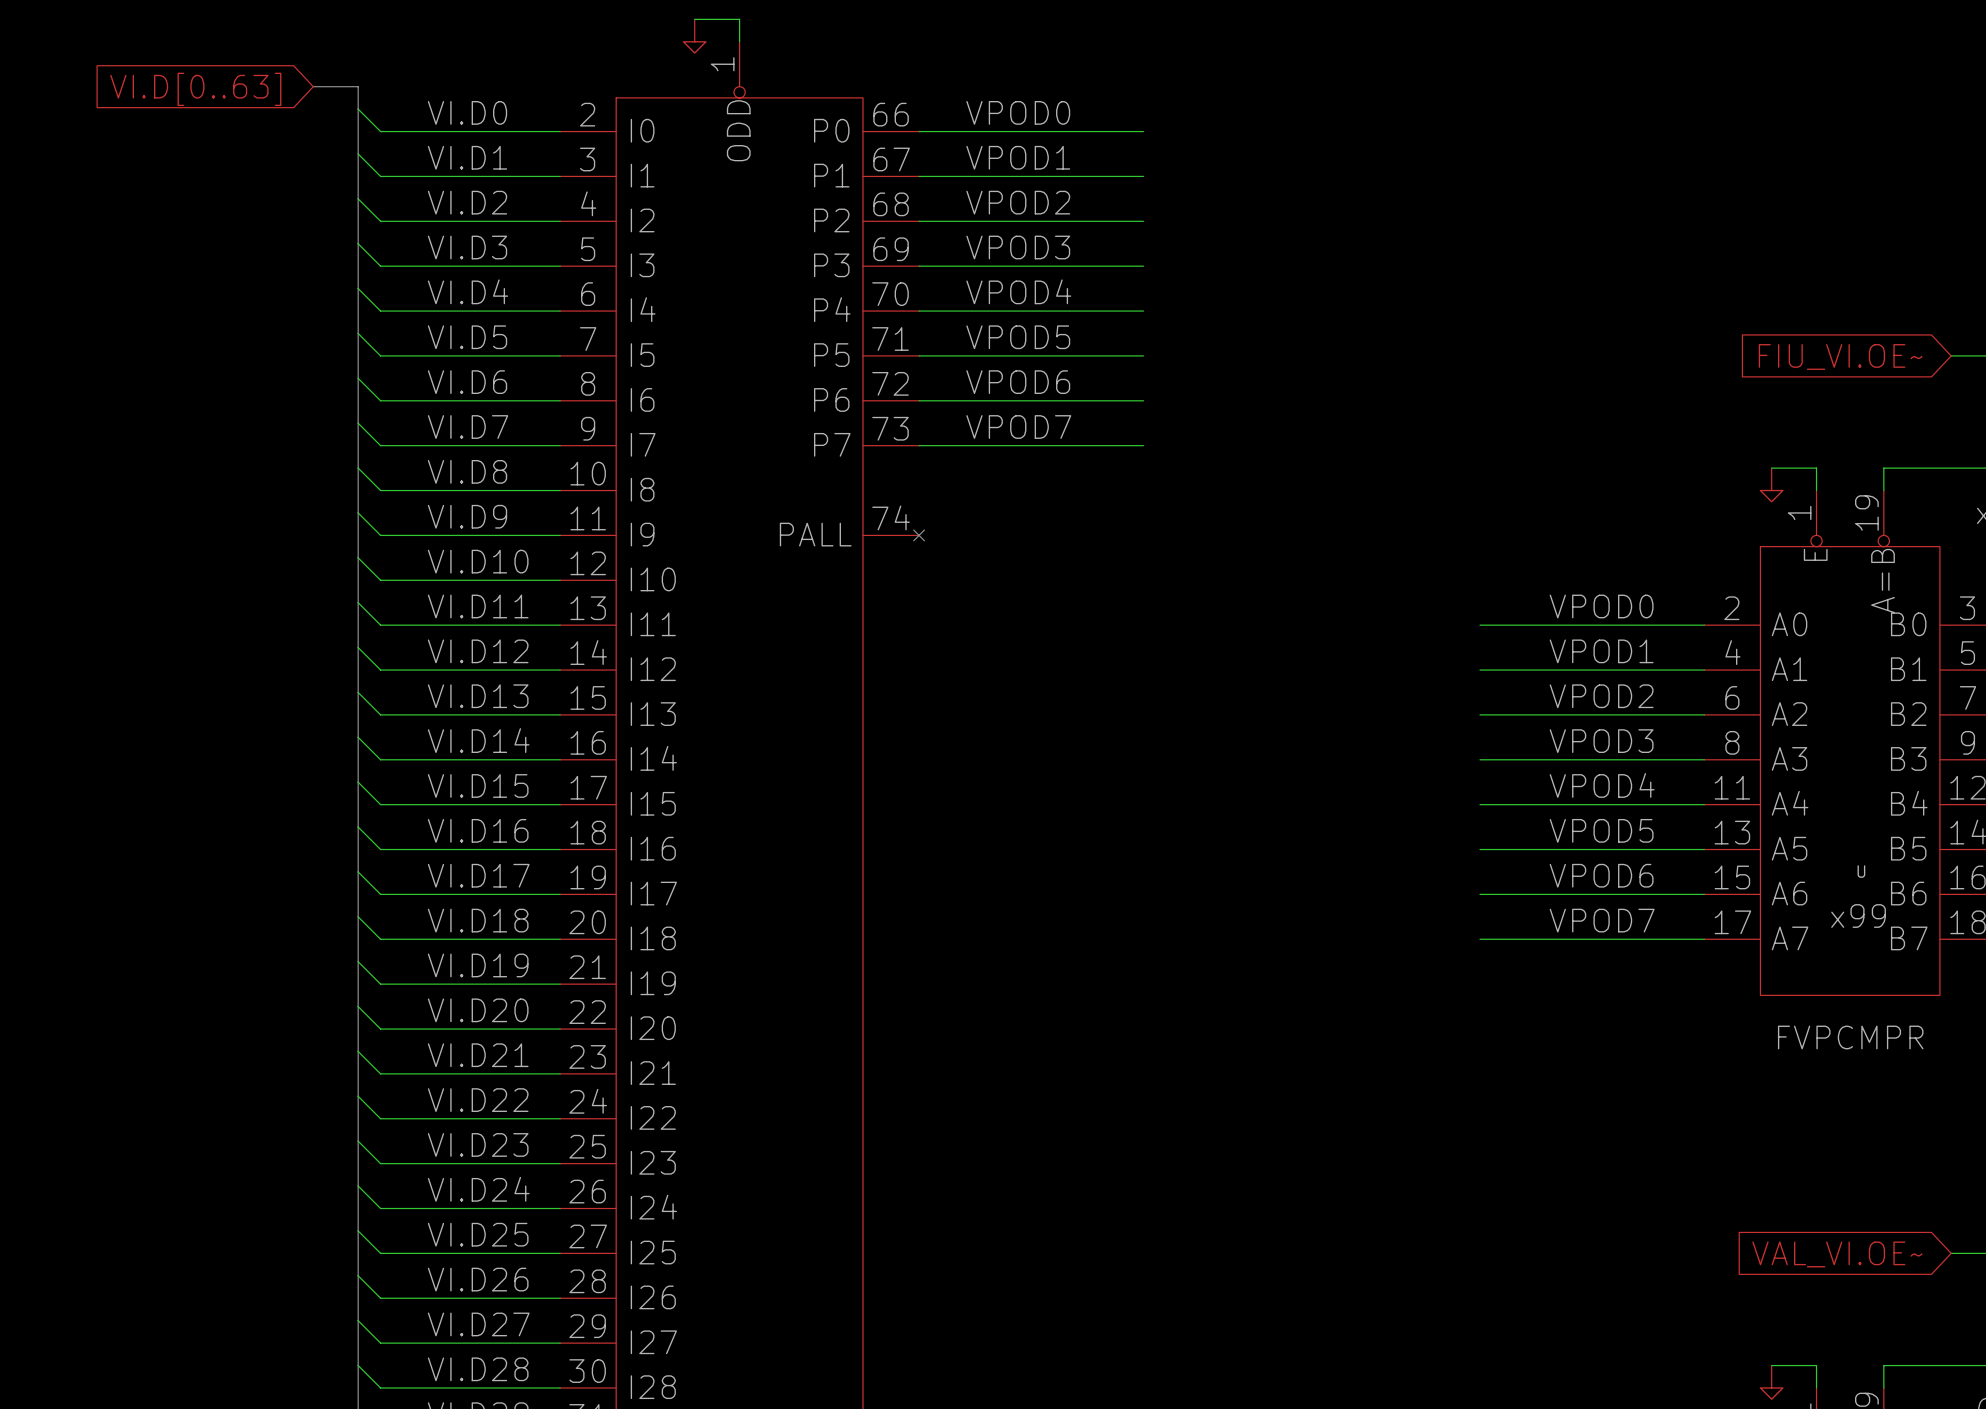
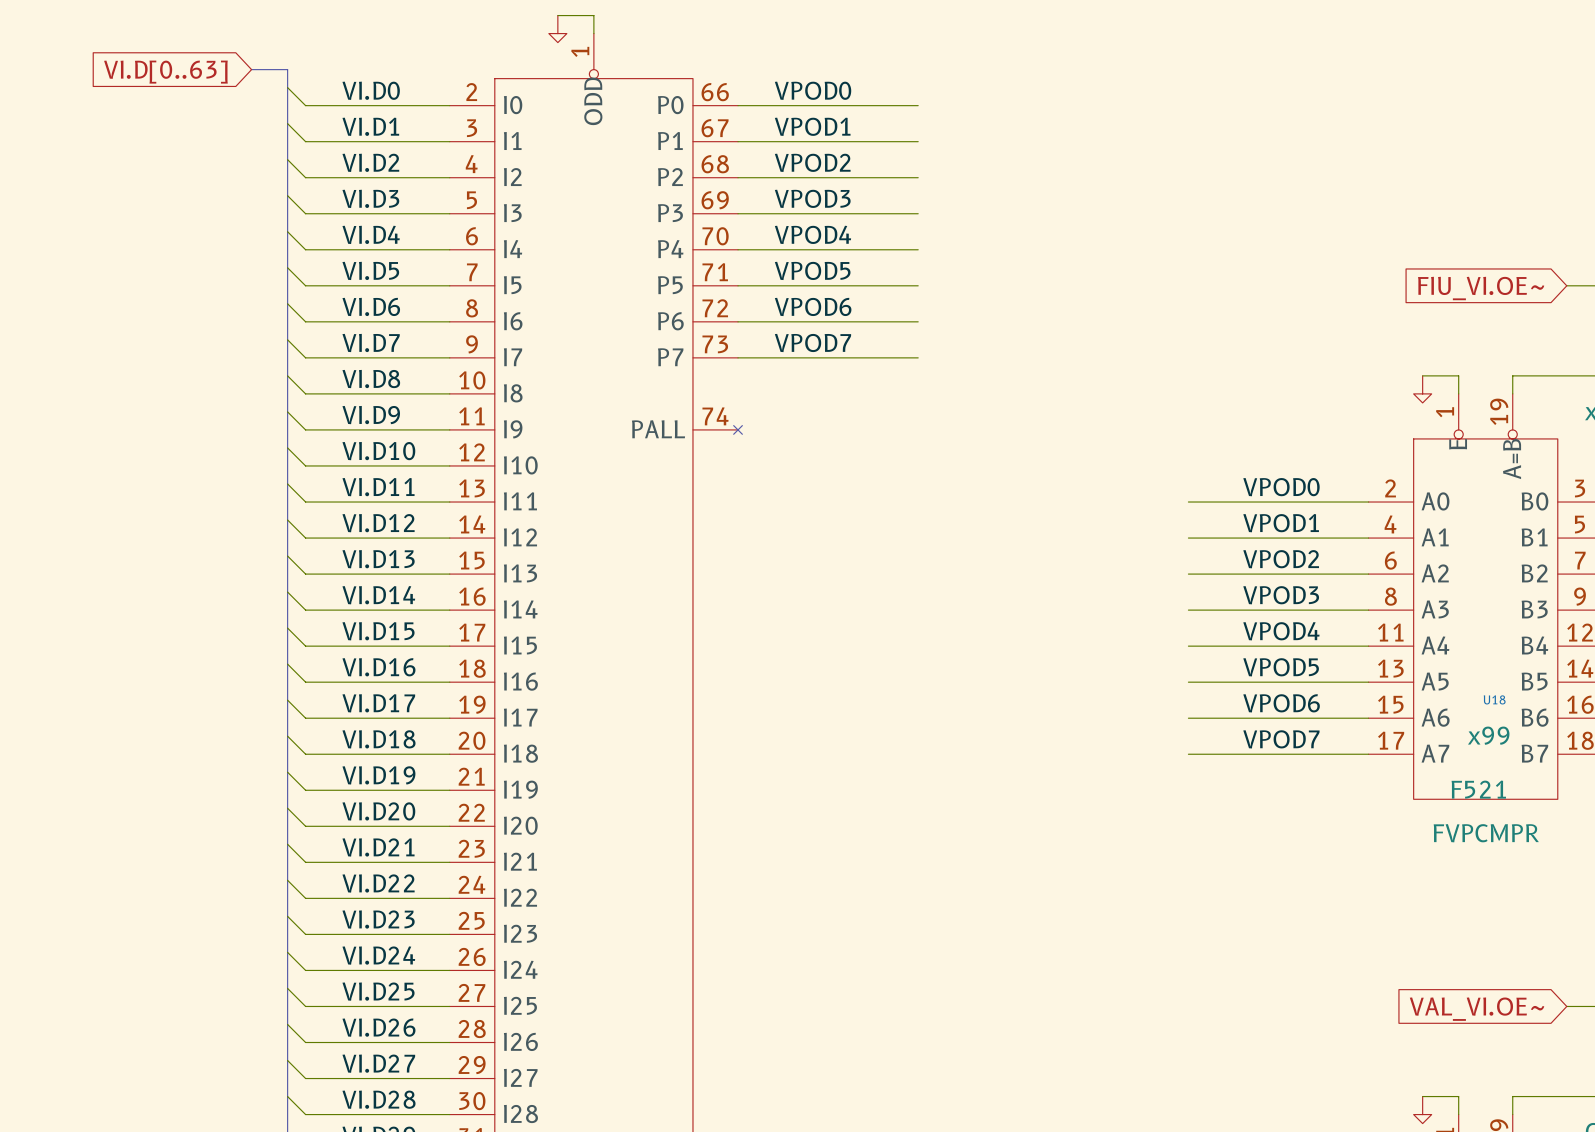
U name: U (1861, 871) -> U18 (1494, 699)
U value: none -> F521 (1478, 789)

